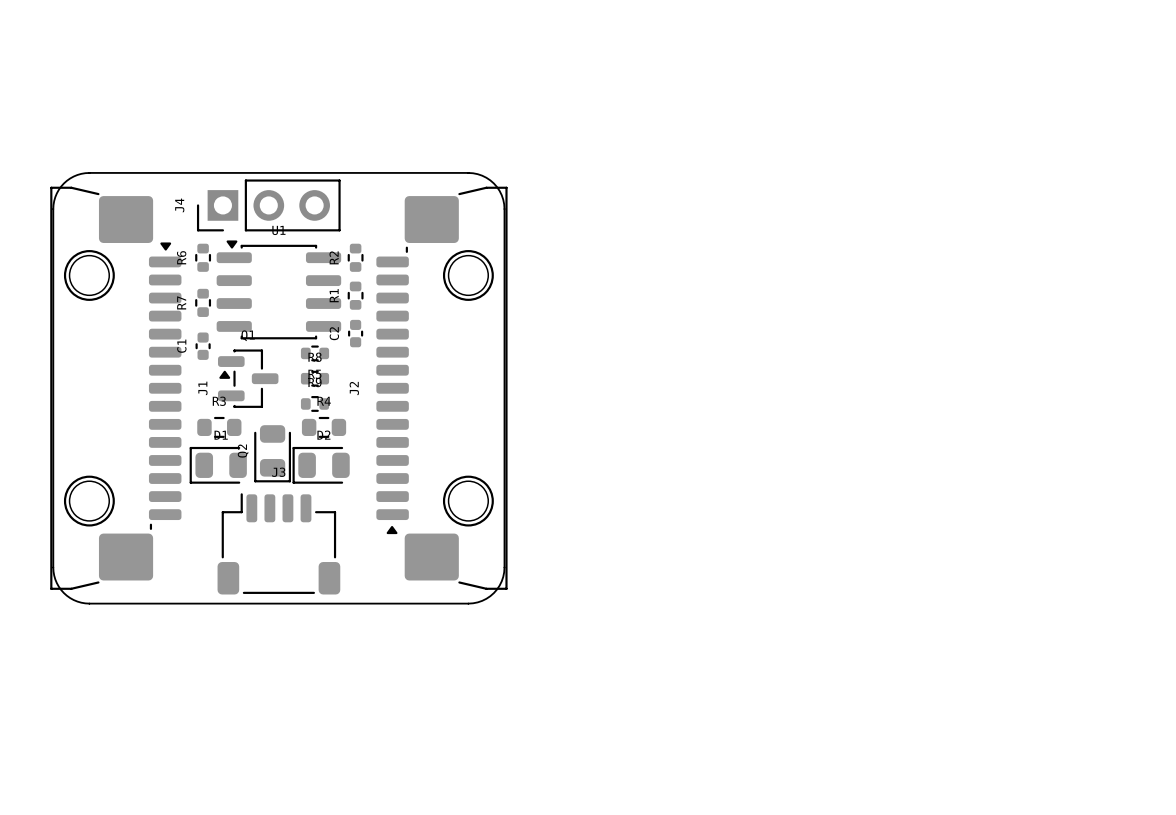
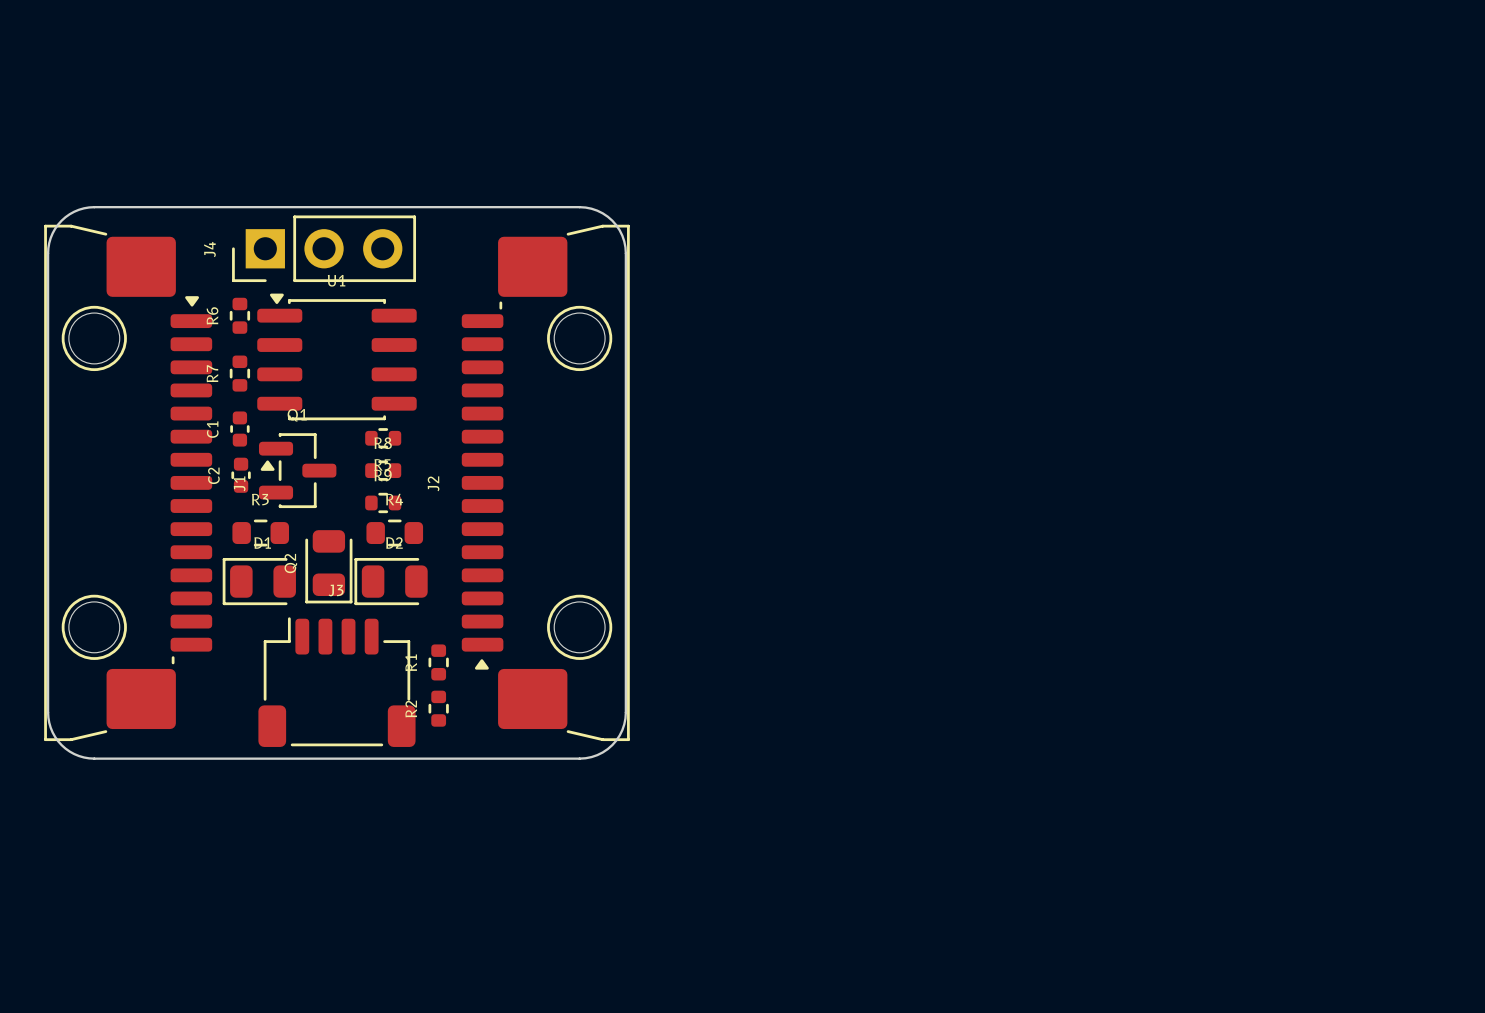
R2 position: (355, 257) -> (438, 708)
R1 position: (355, 295) -> (438, 662)
C2 position: (355, 333) -> (241, 475)

